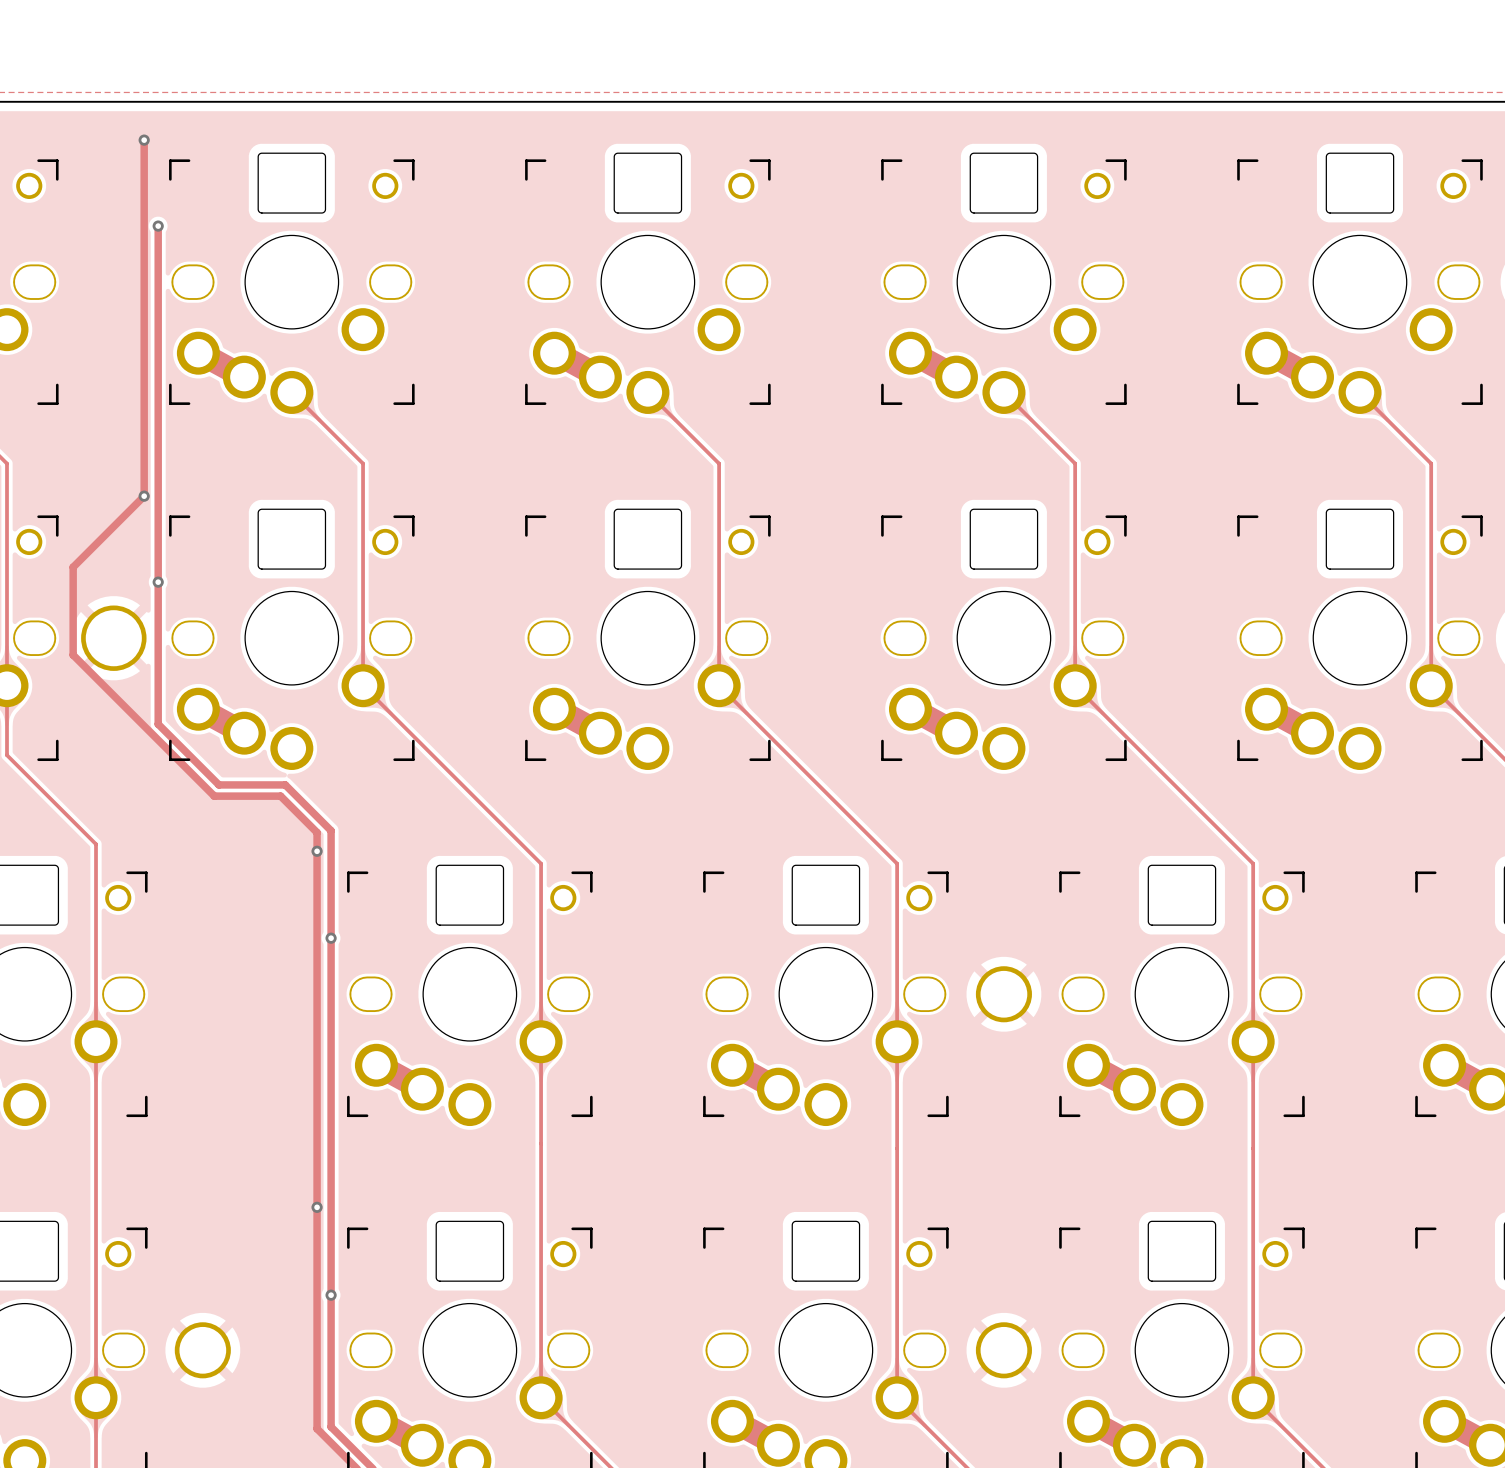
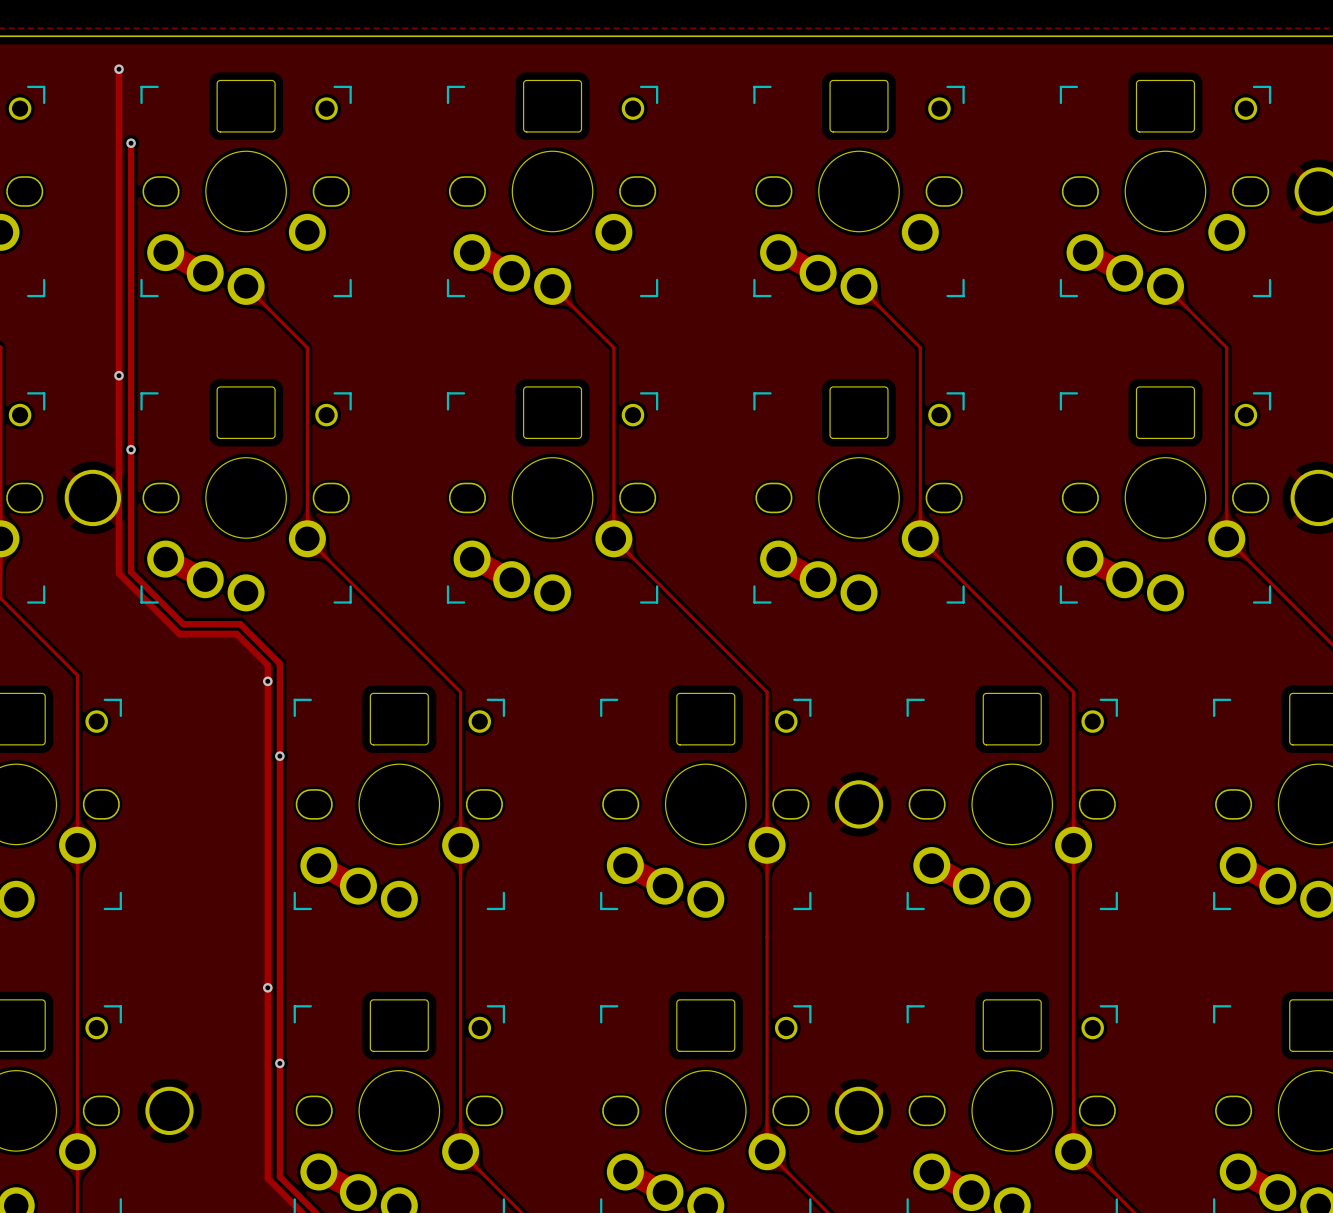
track: (144, 496) (73, 567) (73, 655) (144, 726) -> (119, 375) (119, 573)

